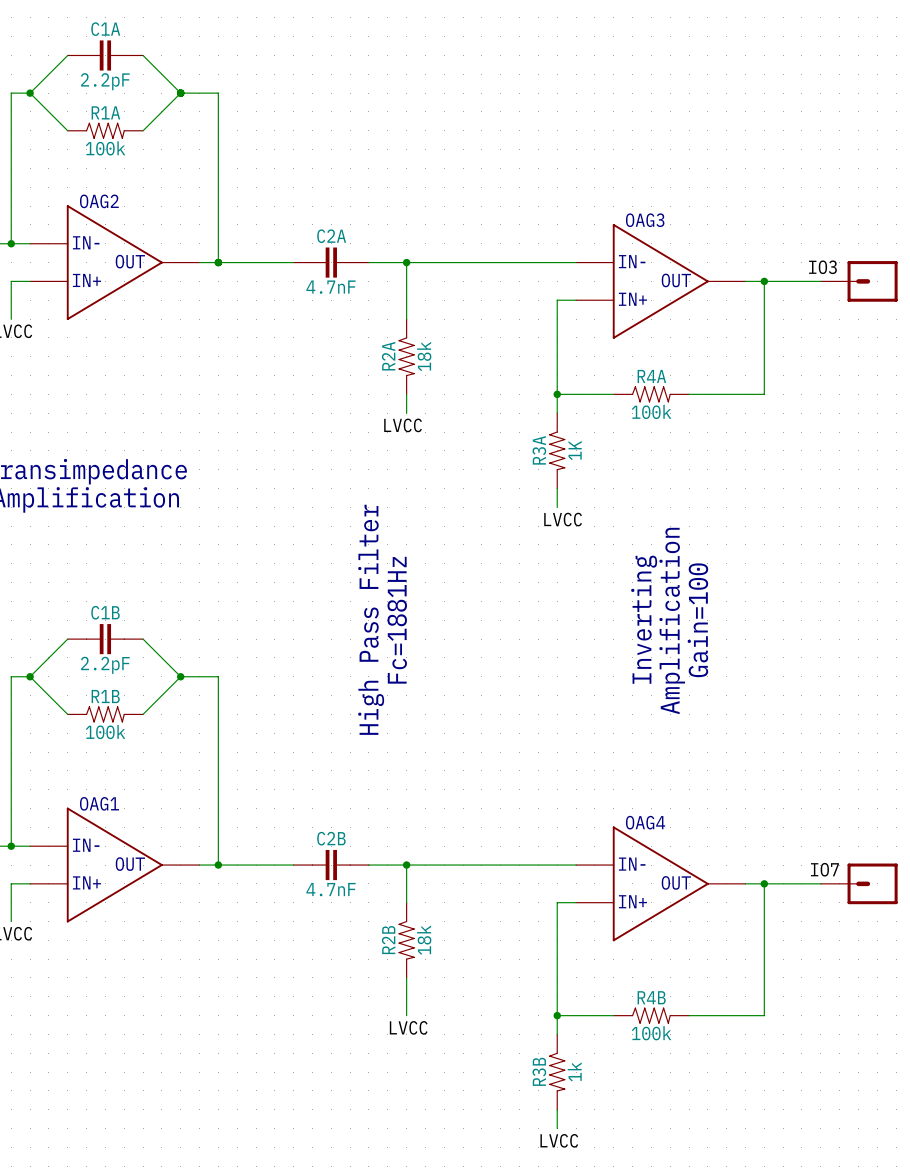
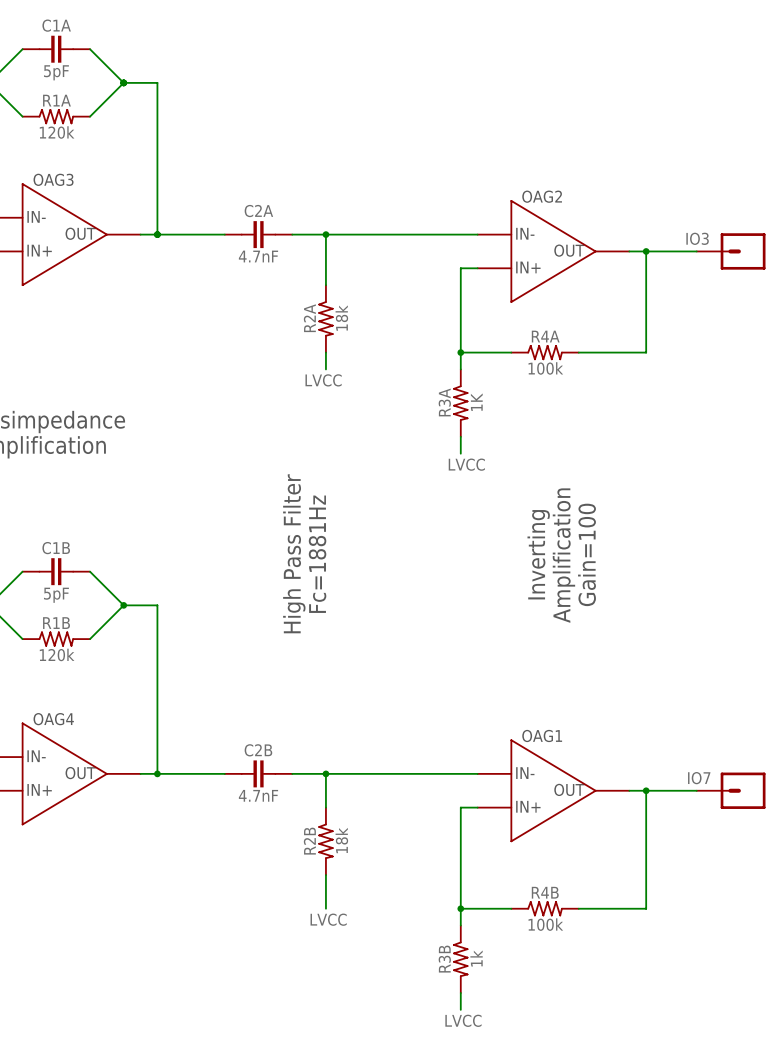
C1A value: 2.2pF (105, 81) -> 5pF (56, 72)
R1A value: 100k (105, 148) -> 120k (57, 132)
OAG2 name: OAG2 (99, 201) -> OAG3 (53, 179)
OAG3 name: OAG3 (645, 220) -> OAG2 (542, 196)
C1B value: 2.2pF (105, 665) -> 5pF (56, 595)
R1B value: 100k (105, 732) -> 120k (57, 654)
OAG1 name: OAG1 (99, 803) -> OAG4 (53, 719)
OAG4 name: OAG4 (645, 822) -> OAG1 (542, 735)

